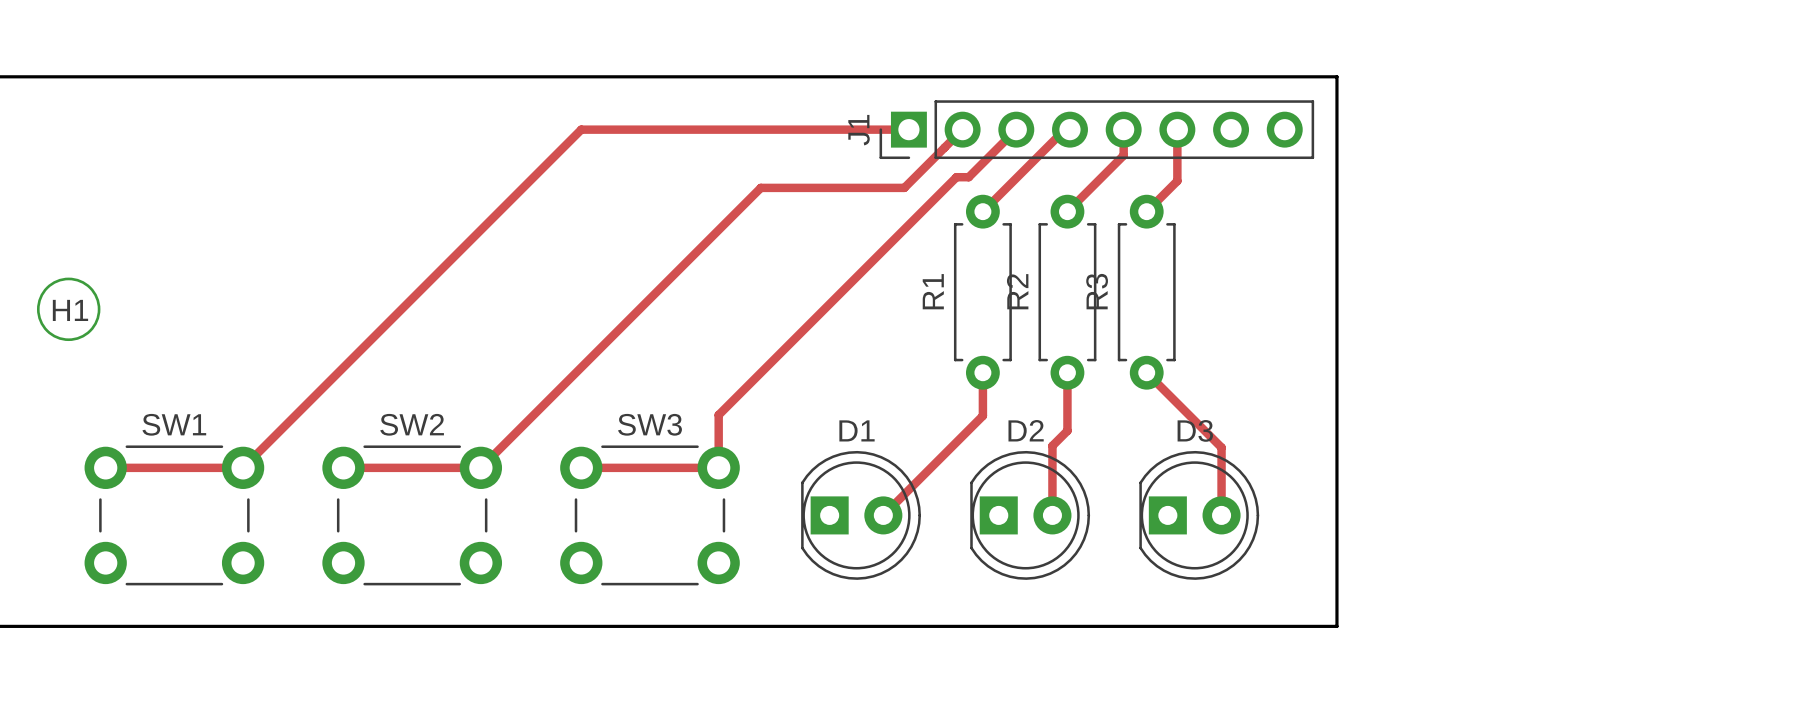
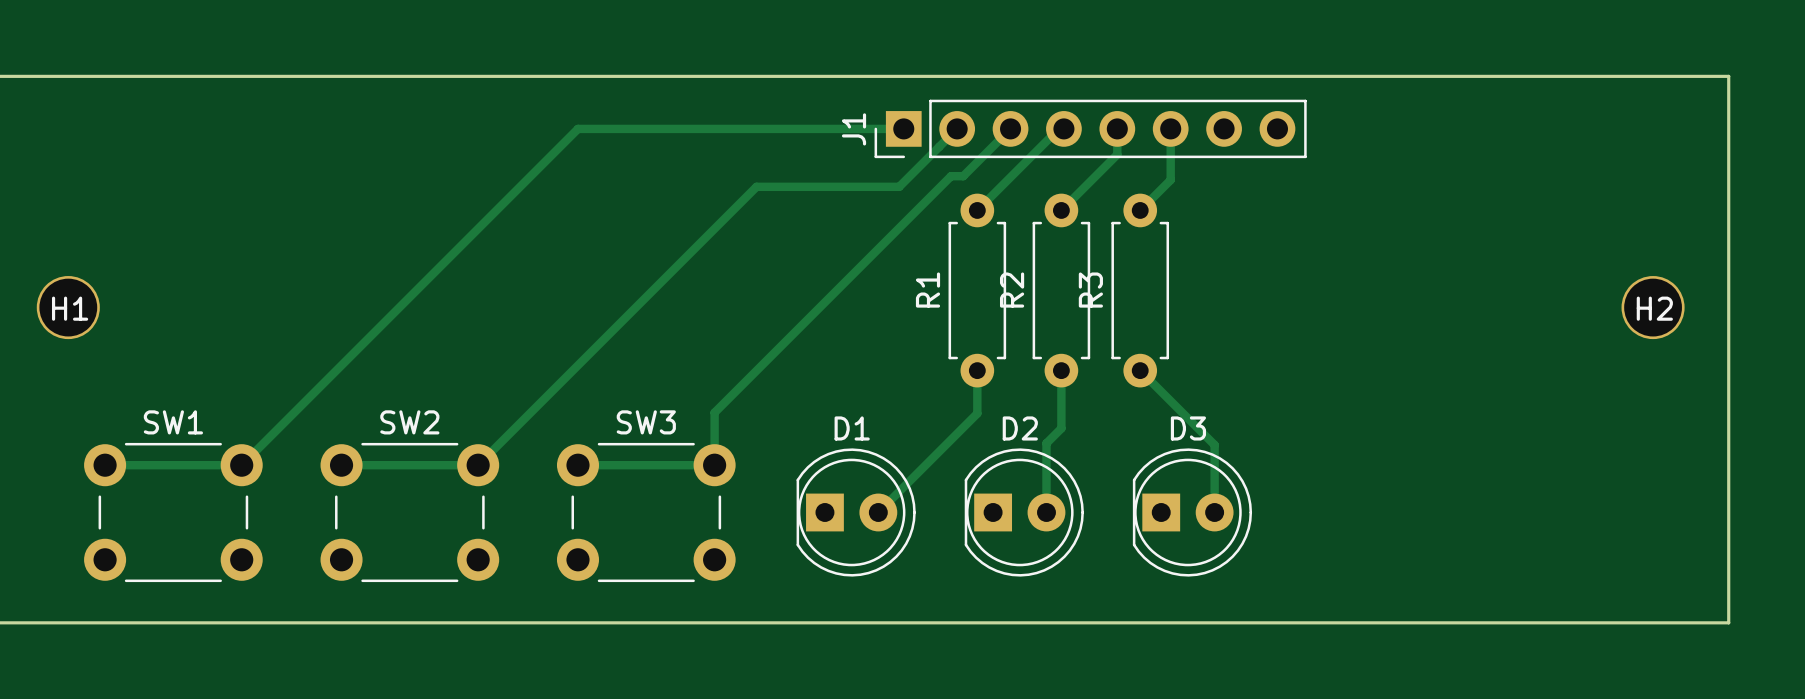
board edge: (1336, 76) (1336, 626) -> (1329, 76) (1728, 76) (1728, 622) (1329, 622)
H2: none -> (1653, 307)

